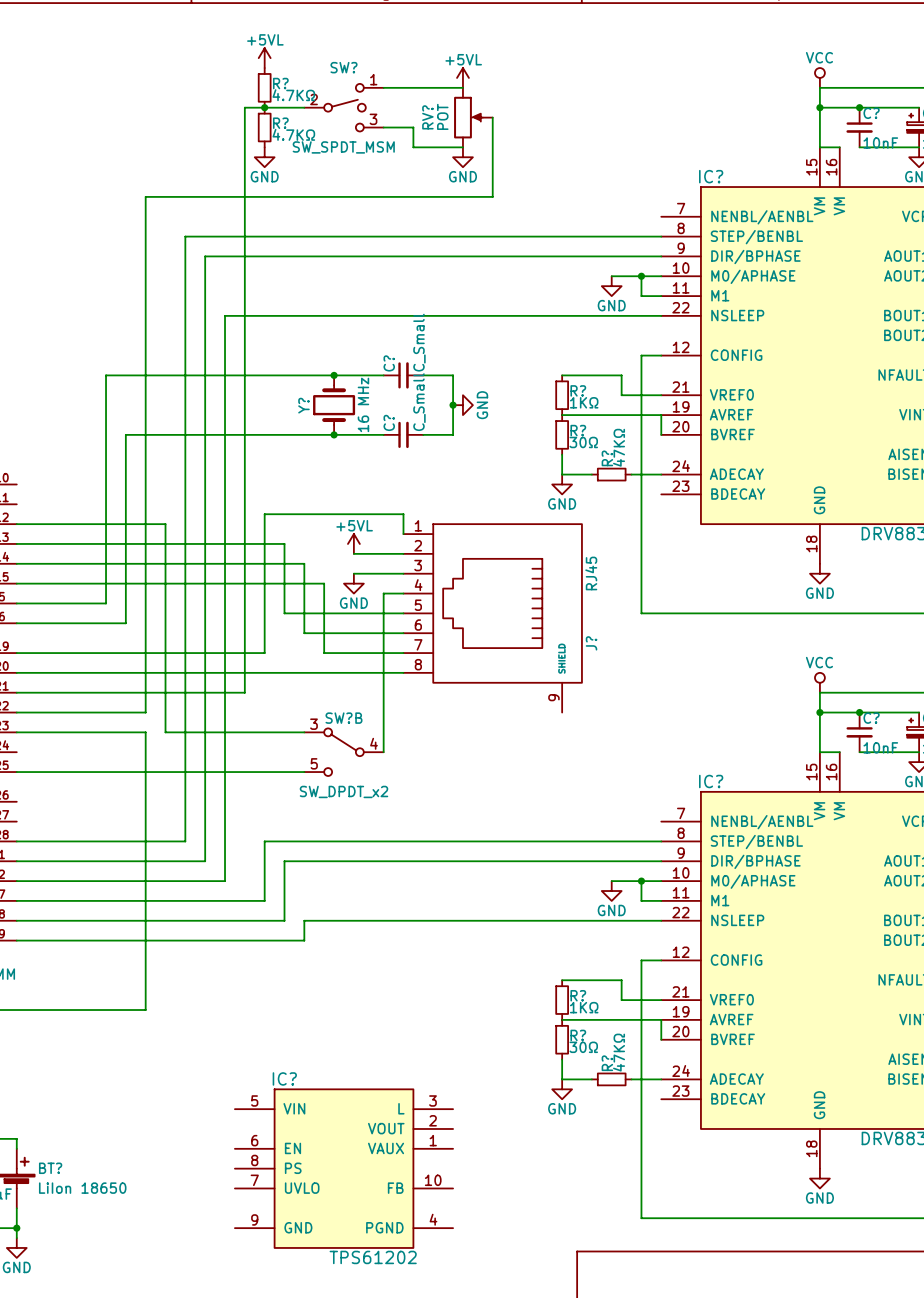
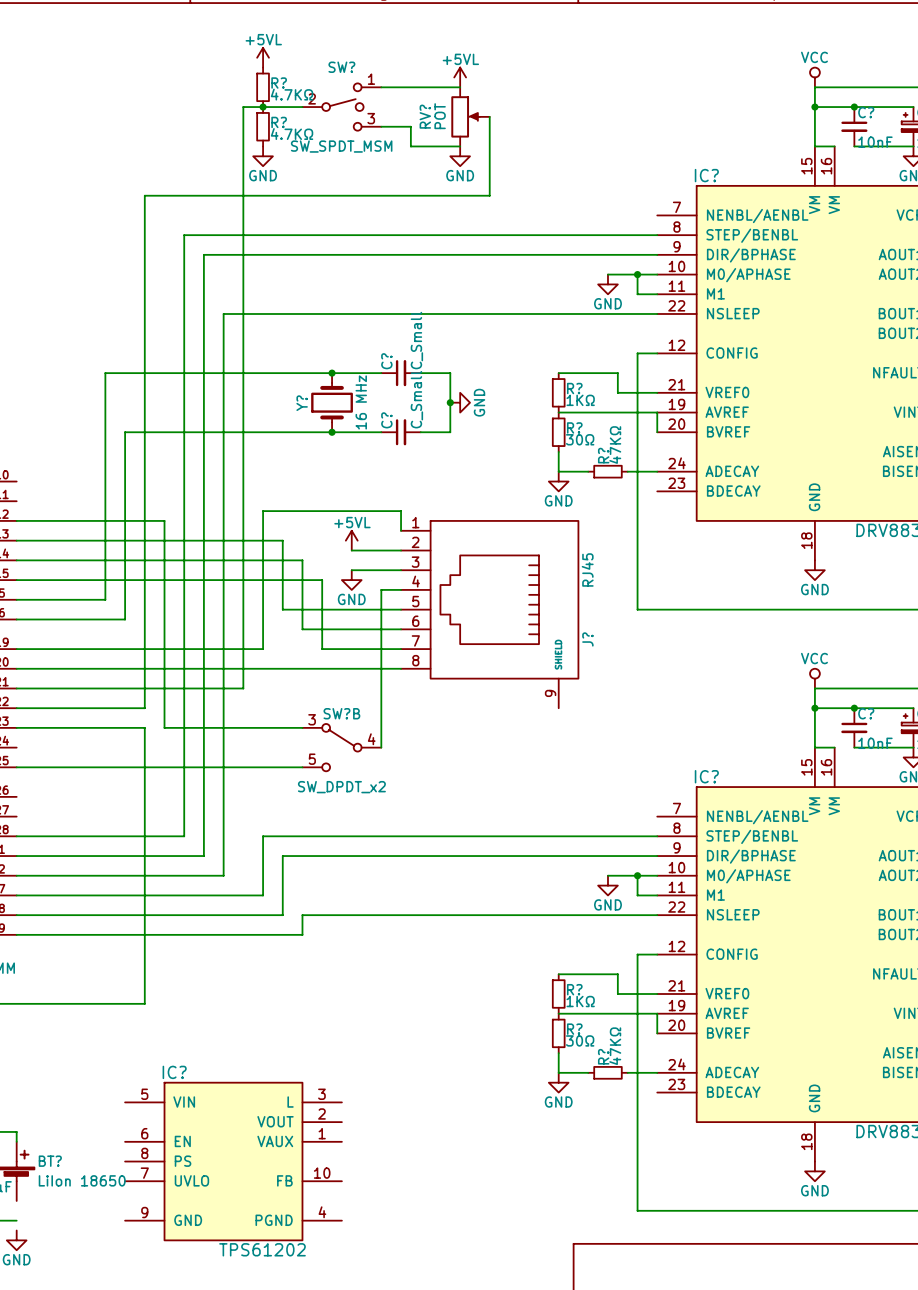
IC? position: (343, 1168) -> (233, 1161)
wire: (16, 1208) (16, 1238) -> none
junction: (16, 1228) -> none

